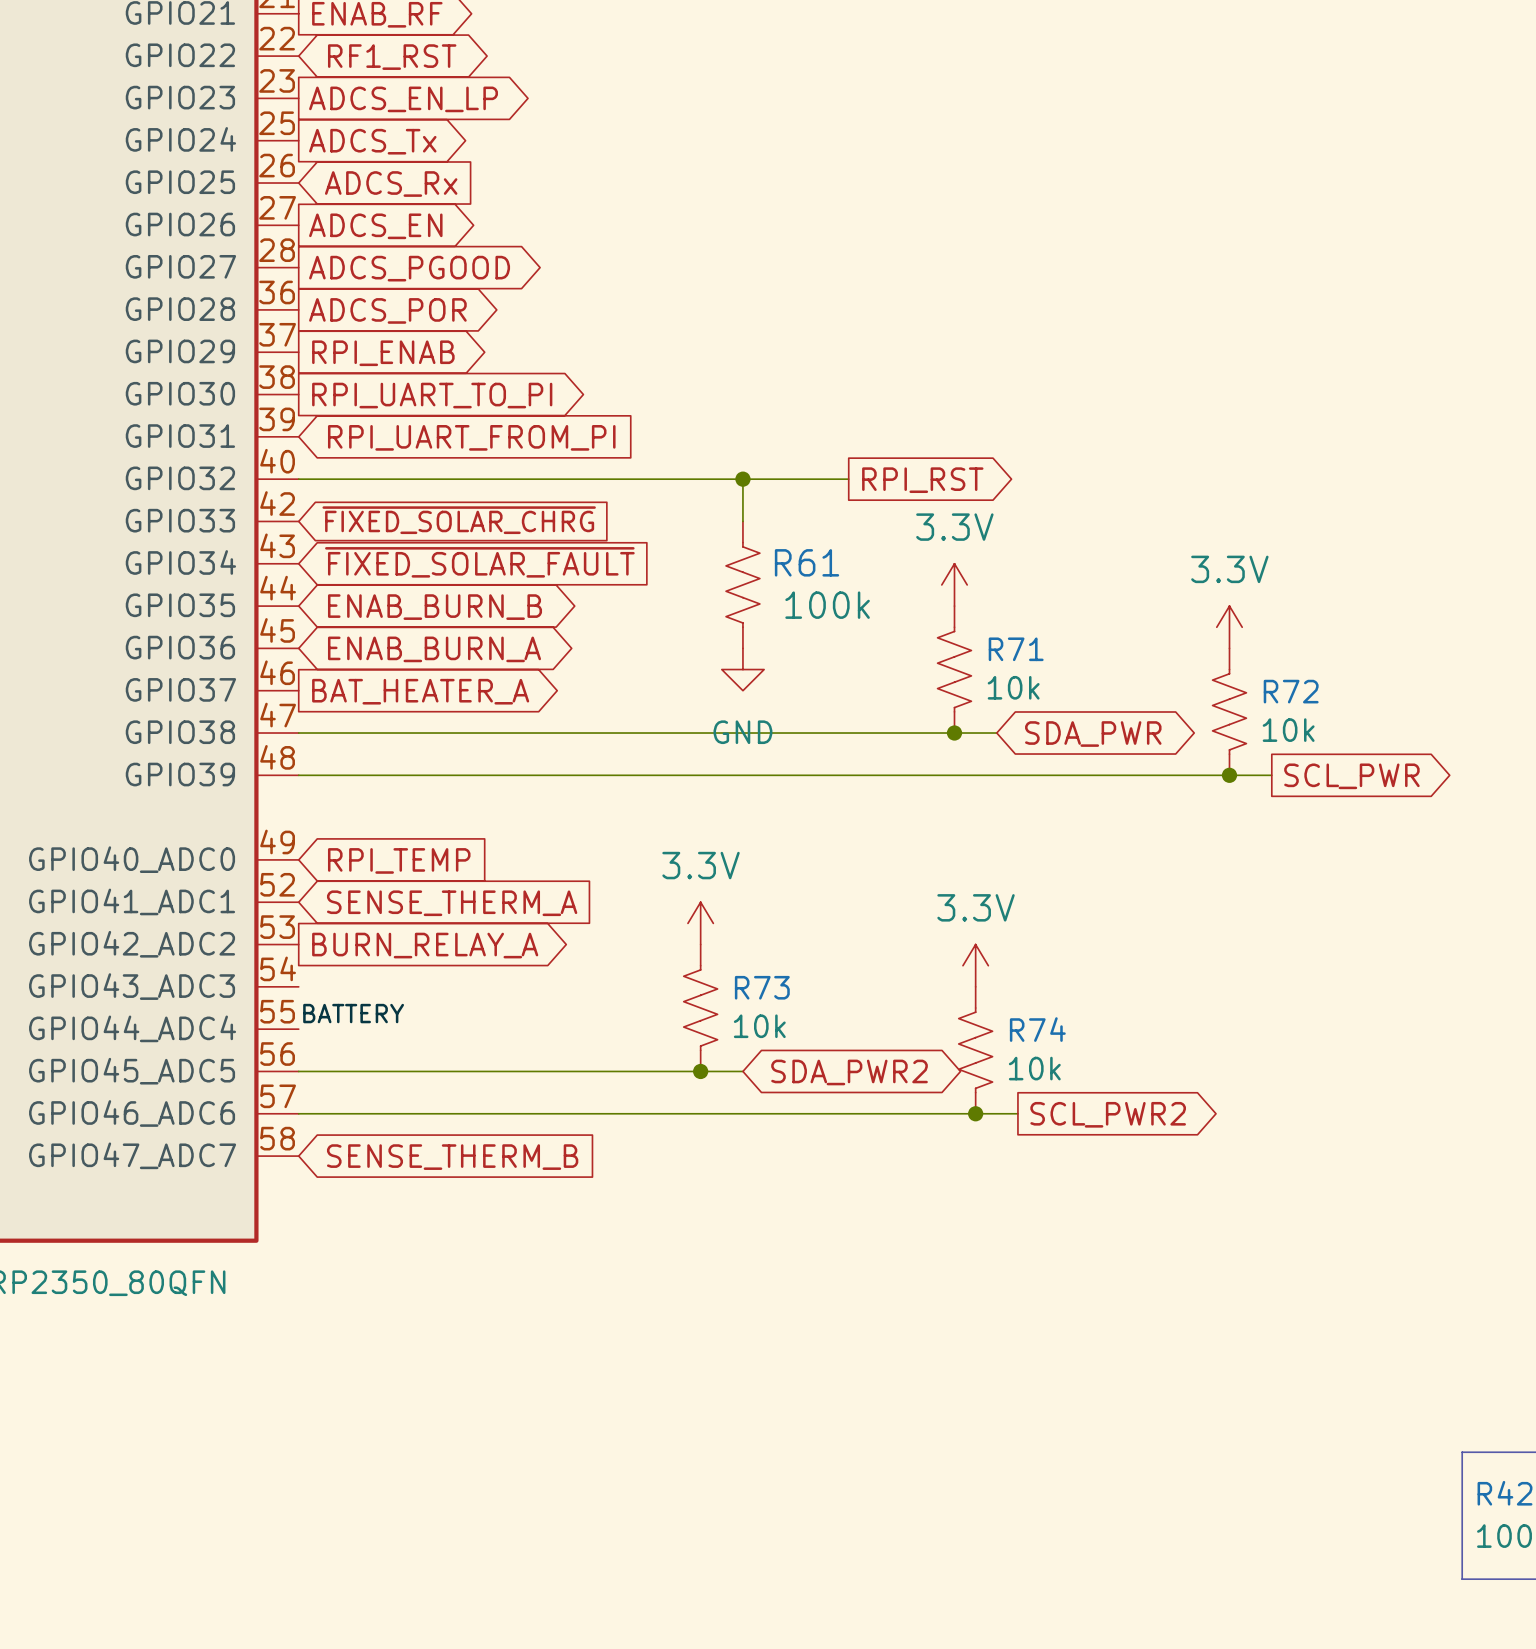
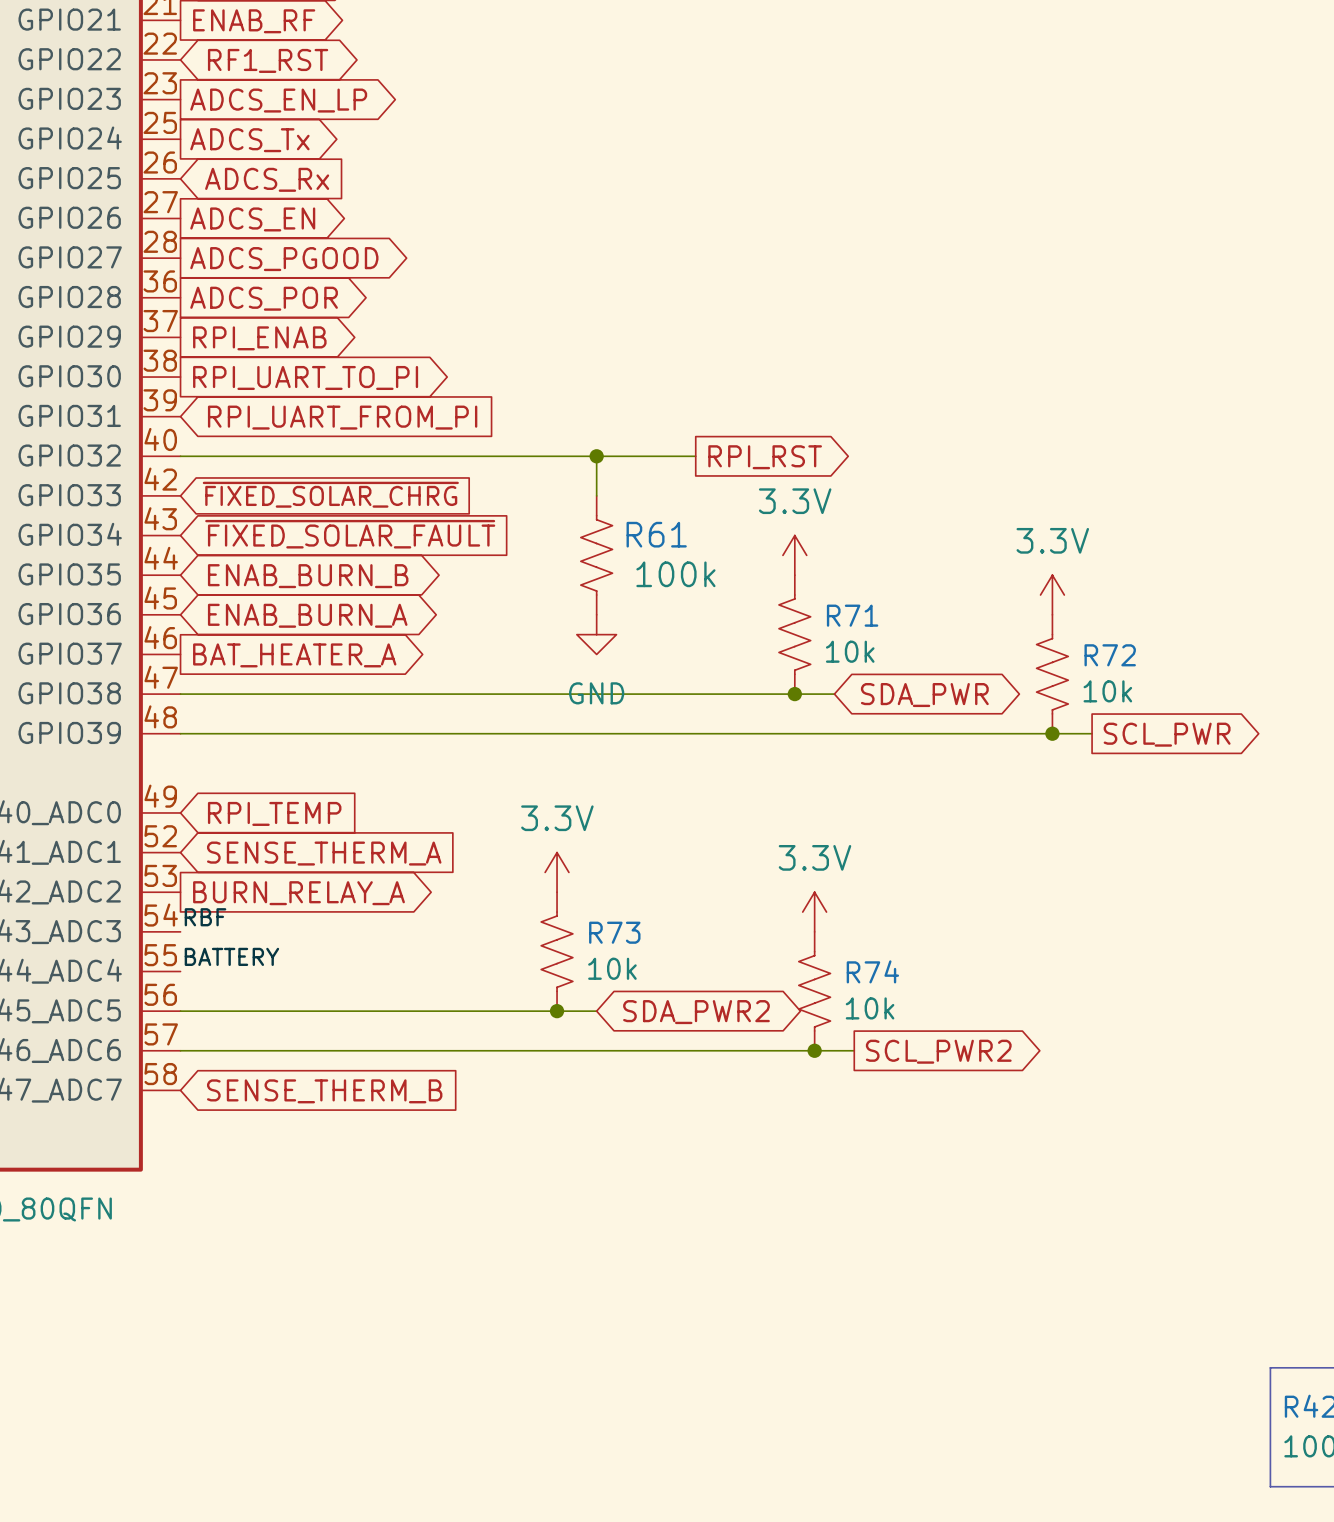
label: none -> RBF (205, 917)

